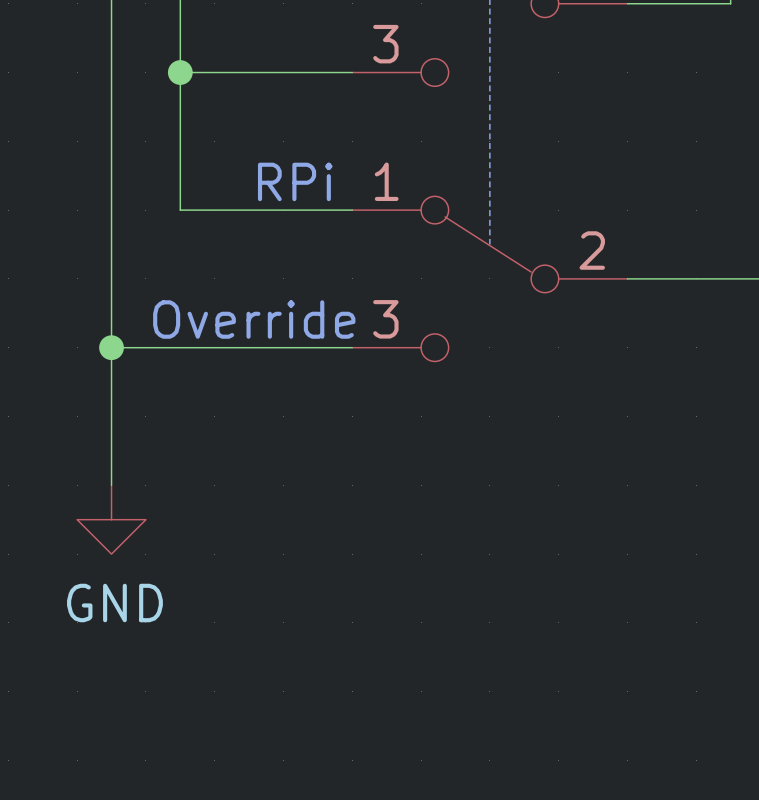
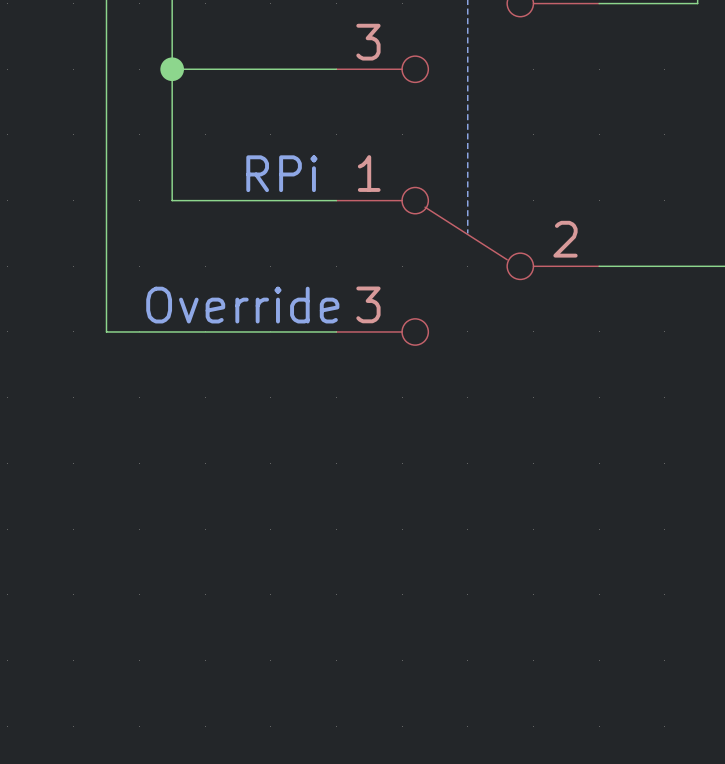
wire: (111, 347) (111, 485) -> none
junction: (111, 347) -> none
power symbol: GND (111, 519) -> none

